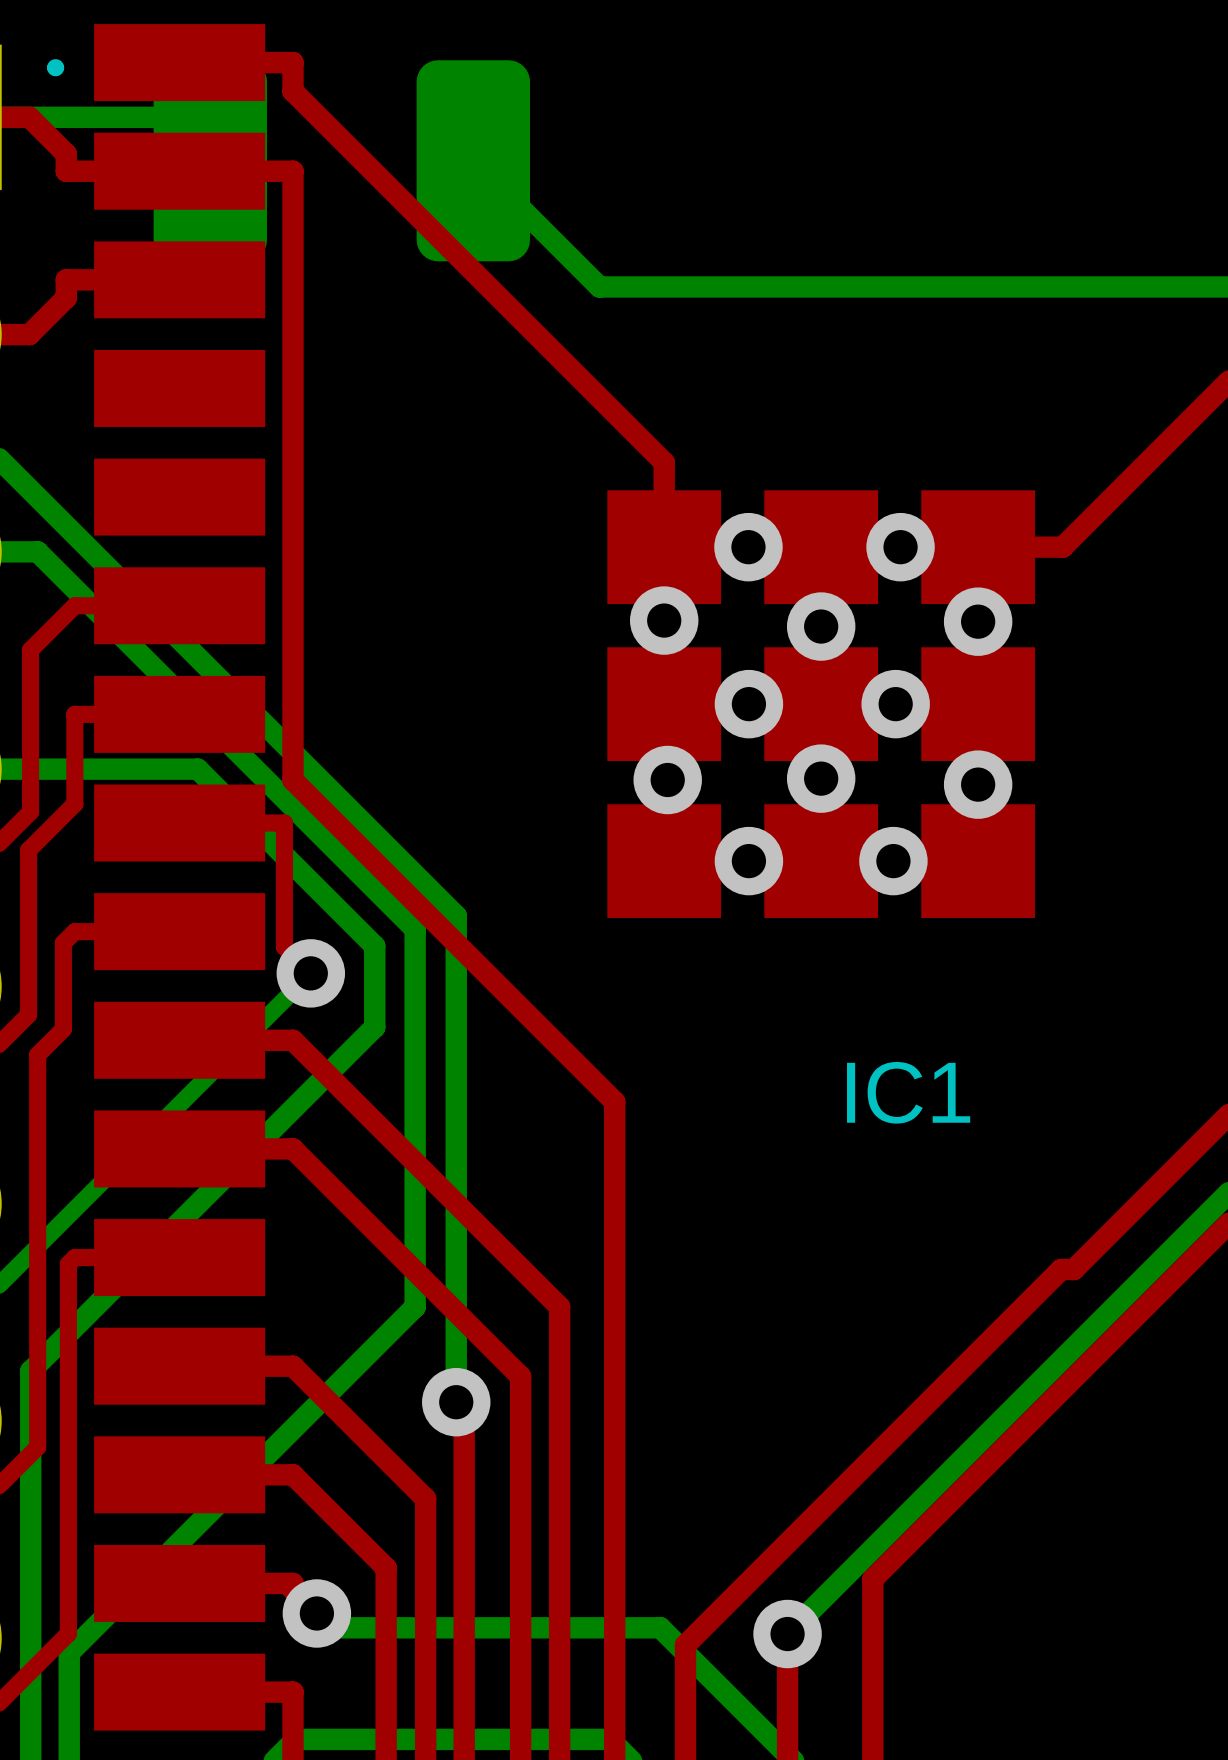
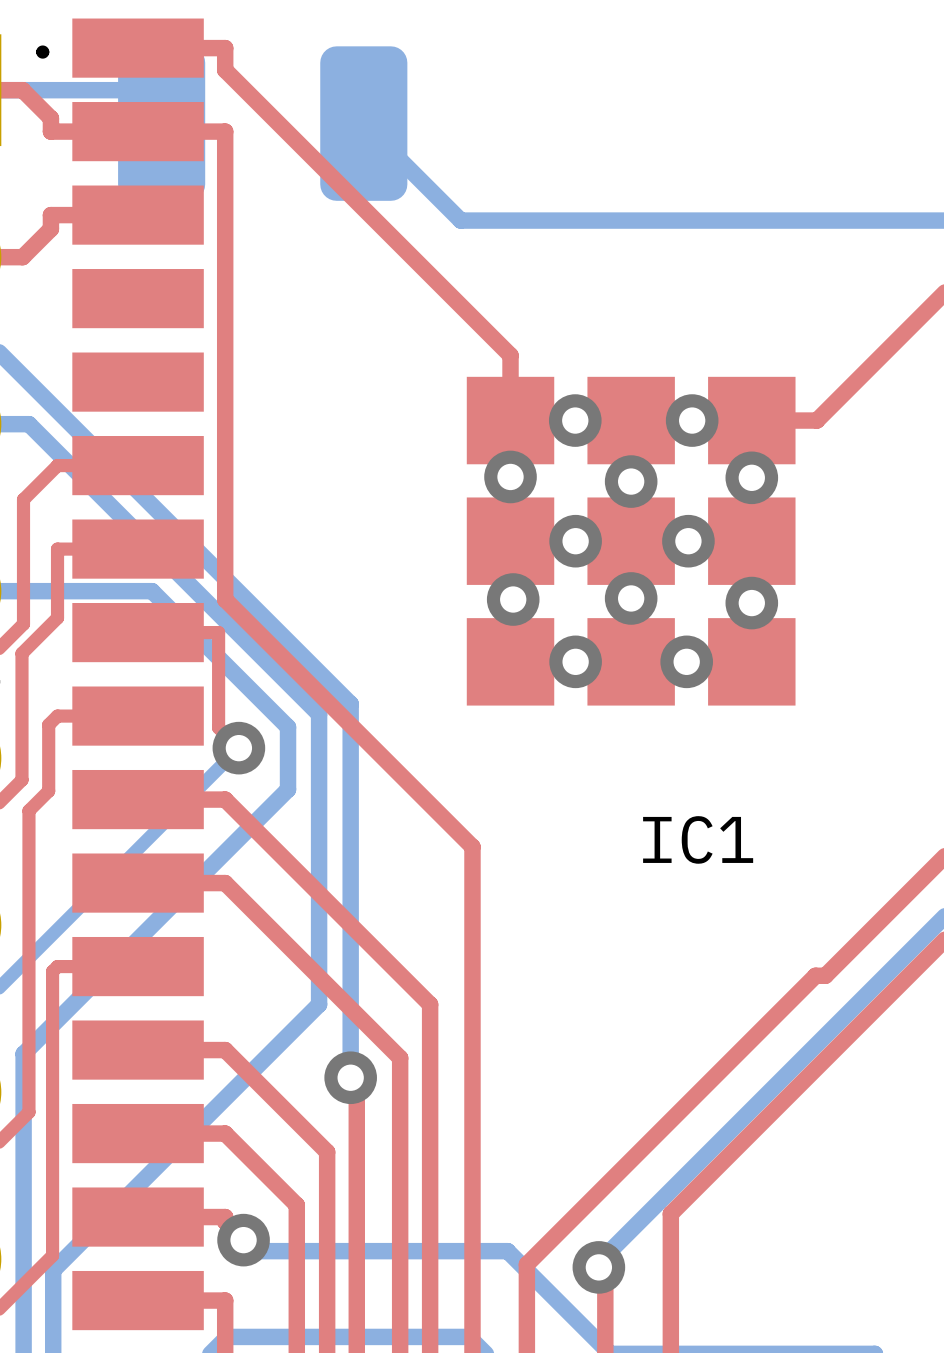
via position: (787, 1634) -> (598, 1267)

